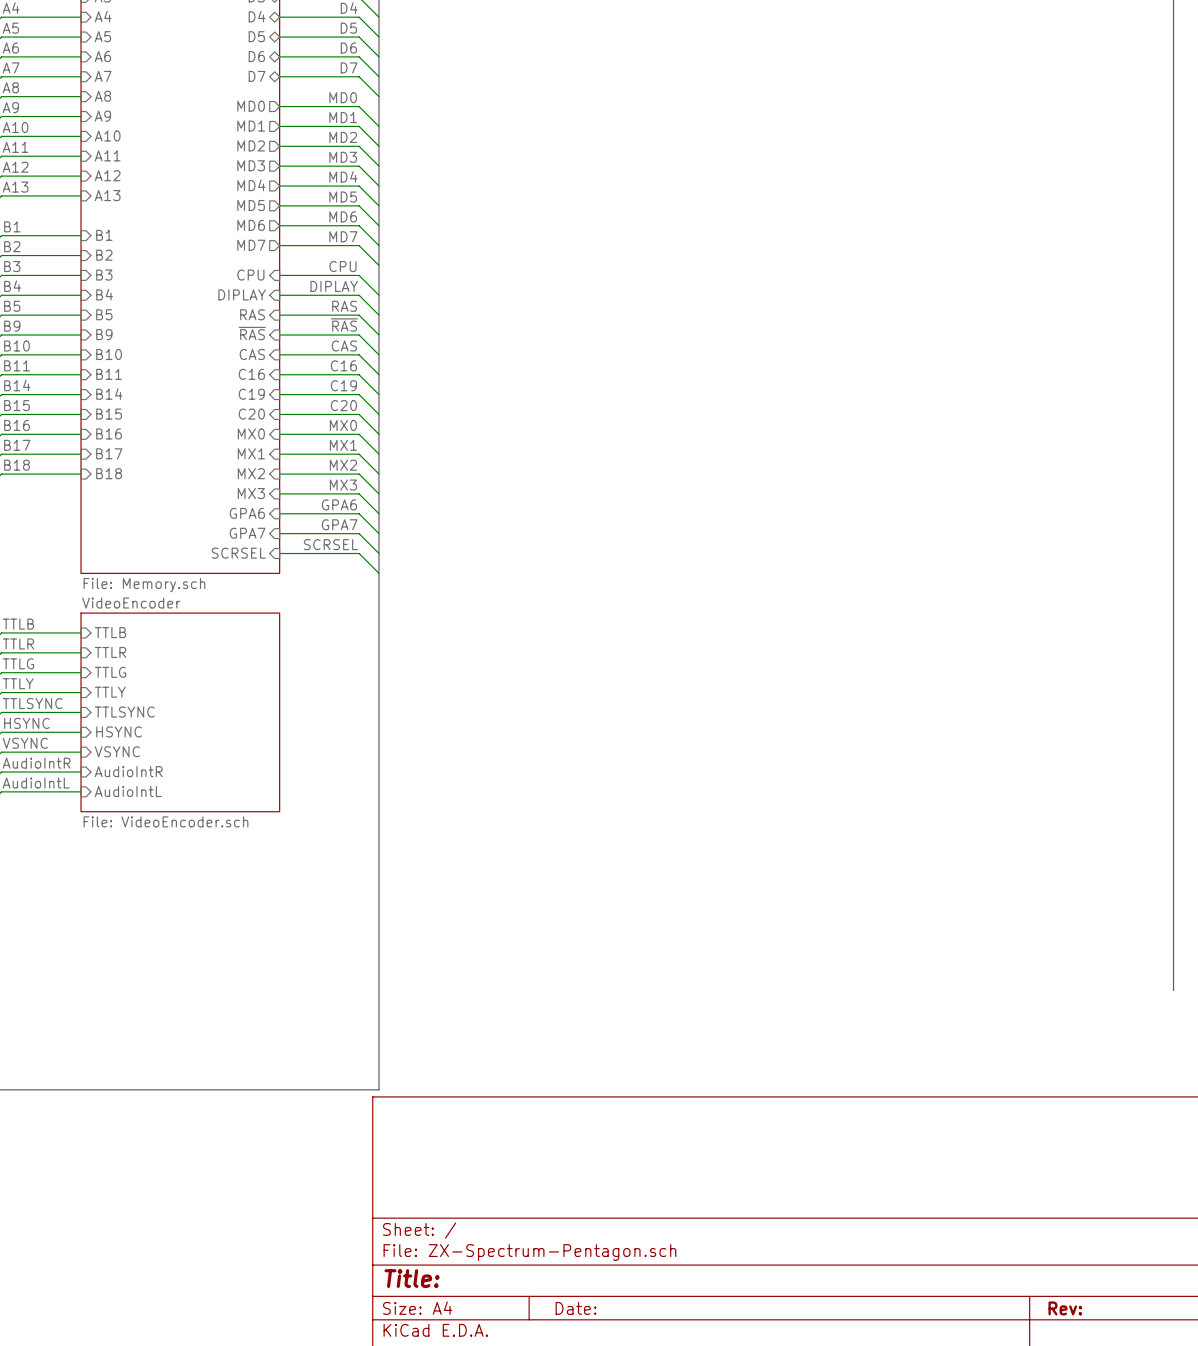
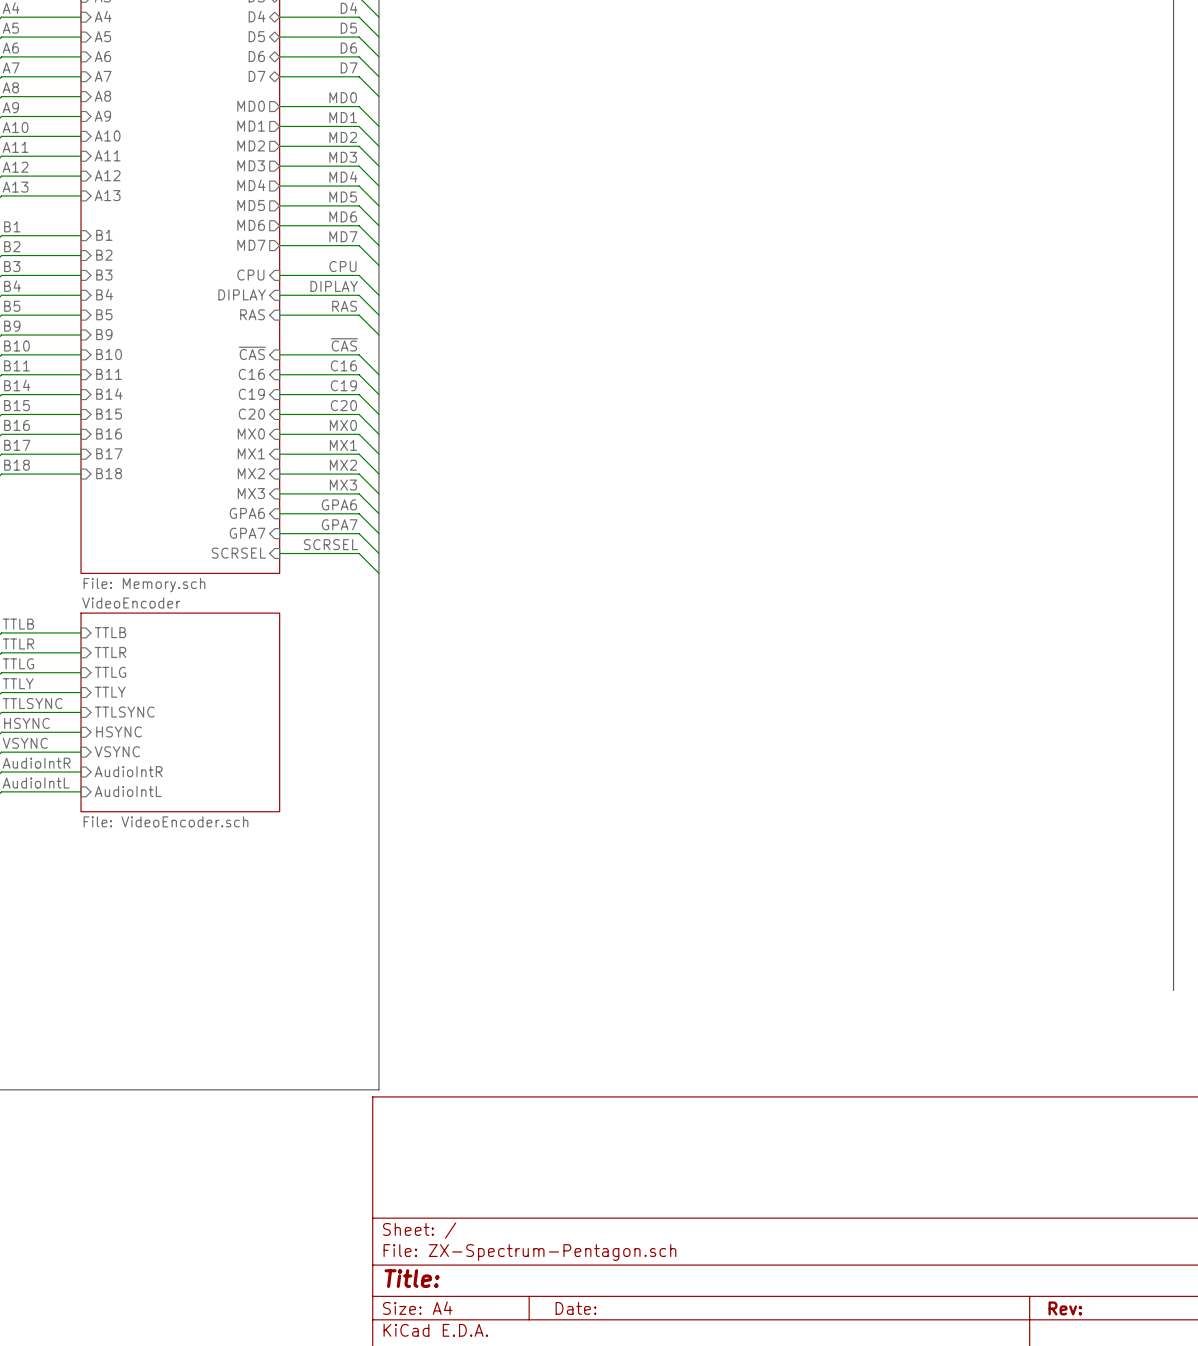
label: ~{RAS} (344, 325) -> none
sheet pin: ~{RAS} (252, 333) -> none
wire: (279, 335) (359, 335) (378, 354) -> none
label: CAS (344, 346) -> ~{CAS} (344, 344)
sheet pin: CAS (252, 354) -> ~{CAS} (252, 353)

